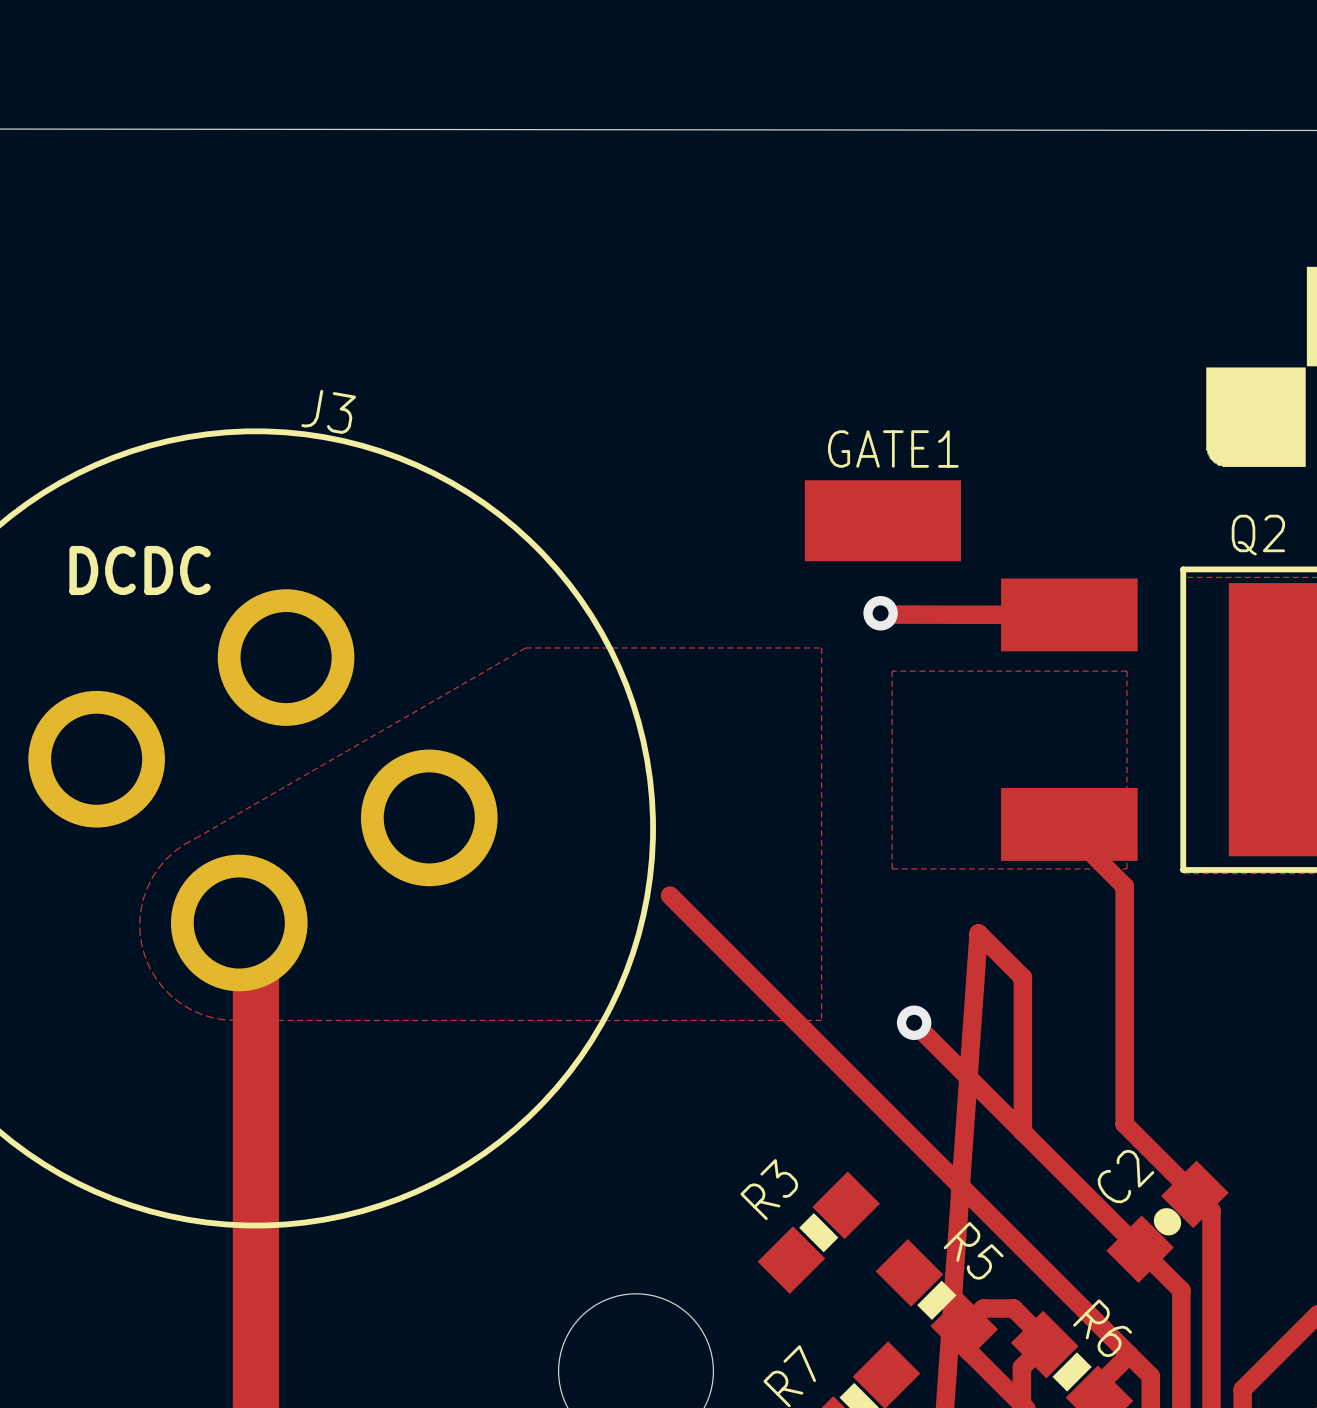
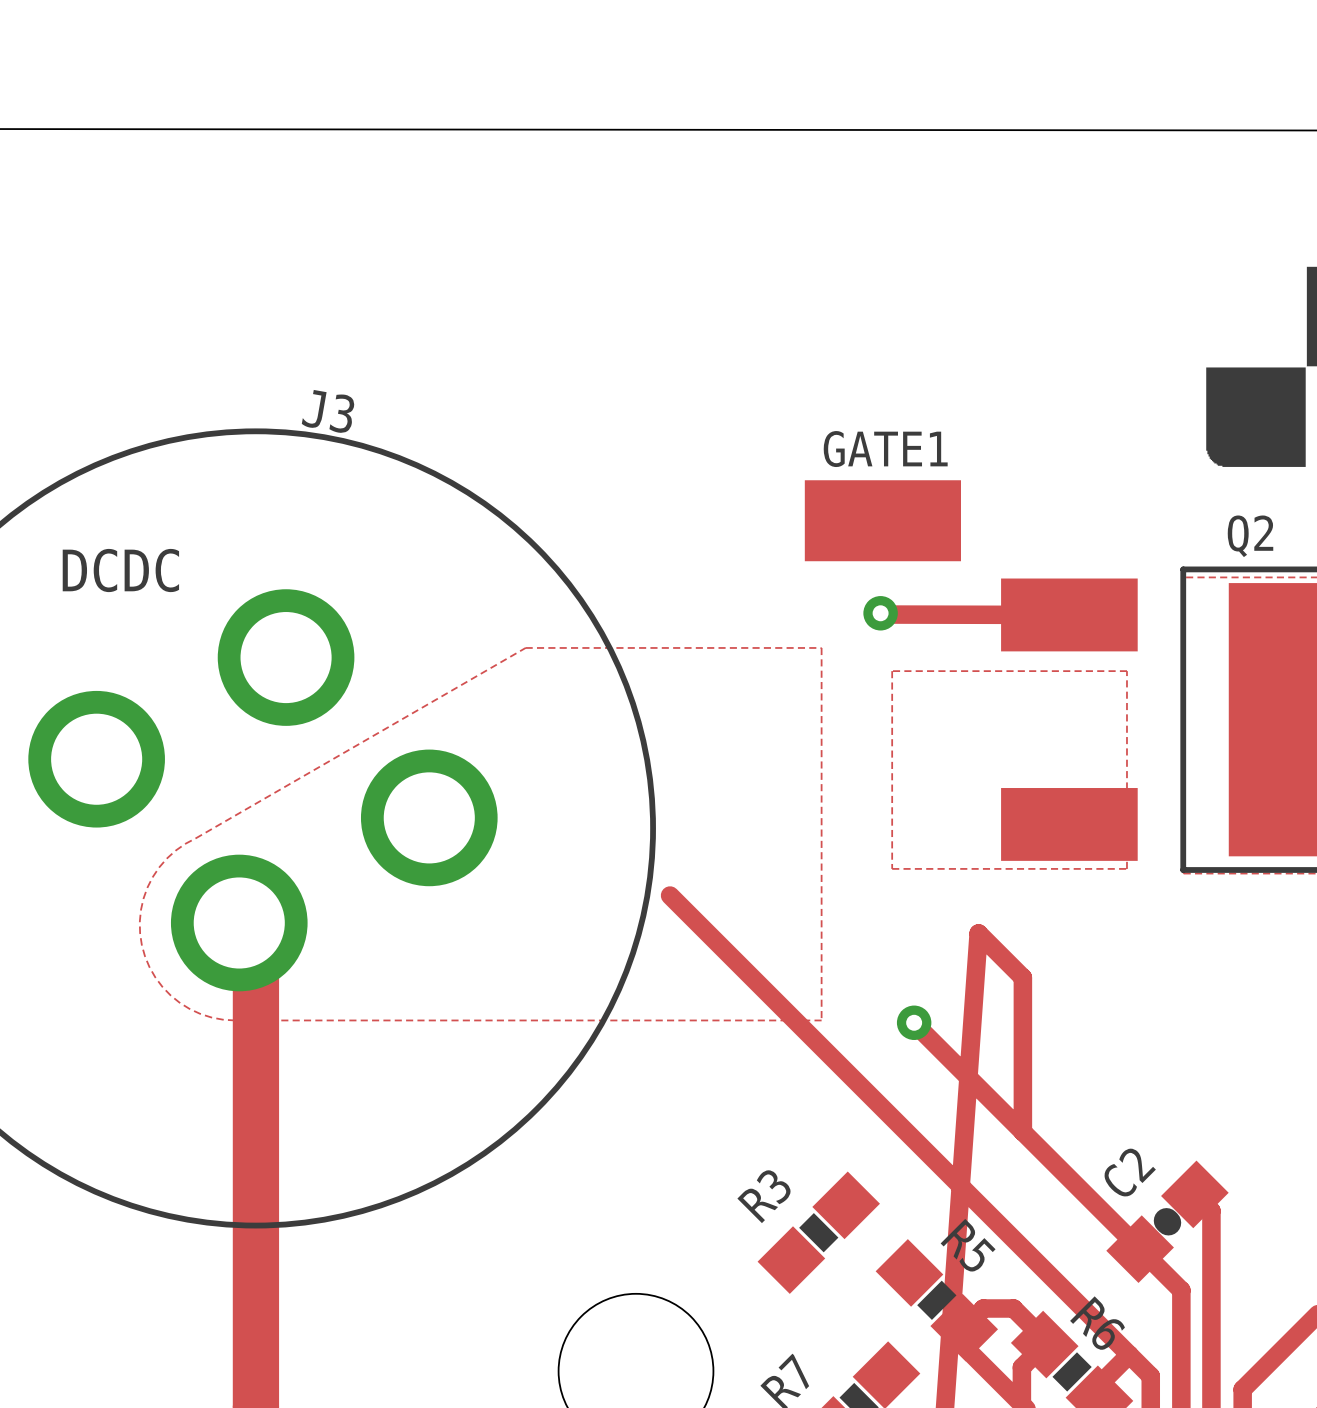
track: (1069, 824) (1061, 823) (1124, 886) (1124, 1124) (1194, 1194) -> none

